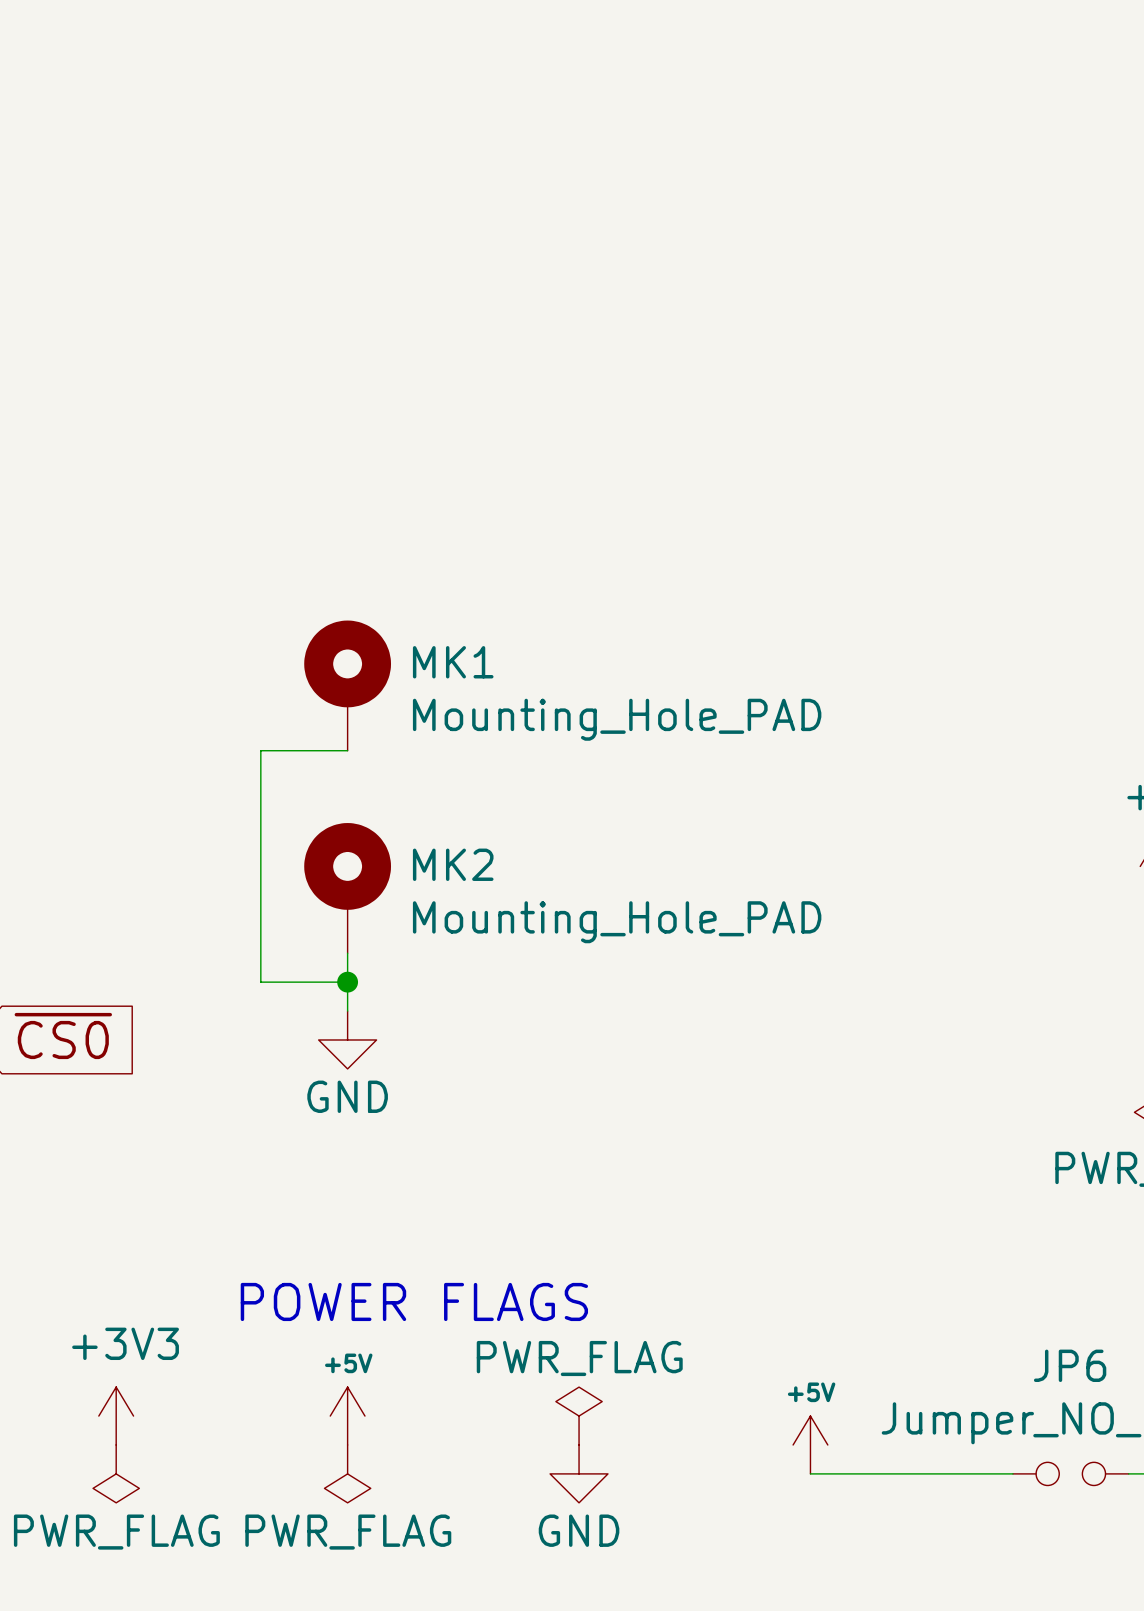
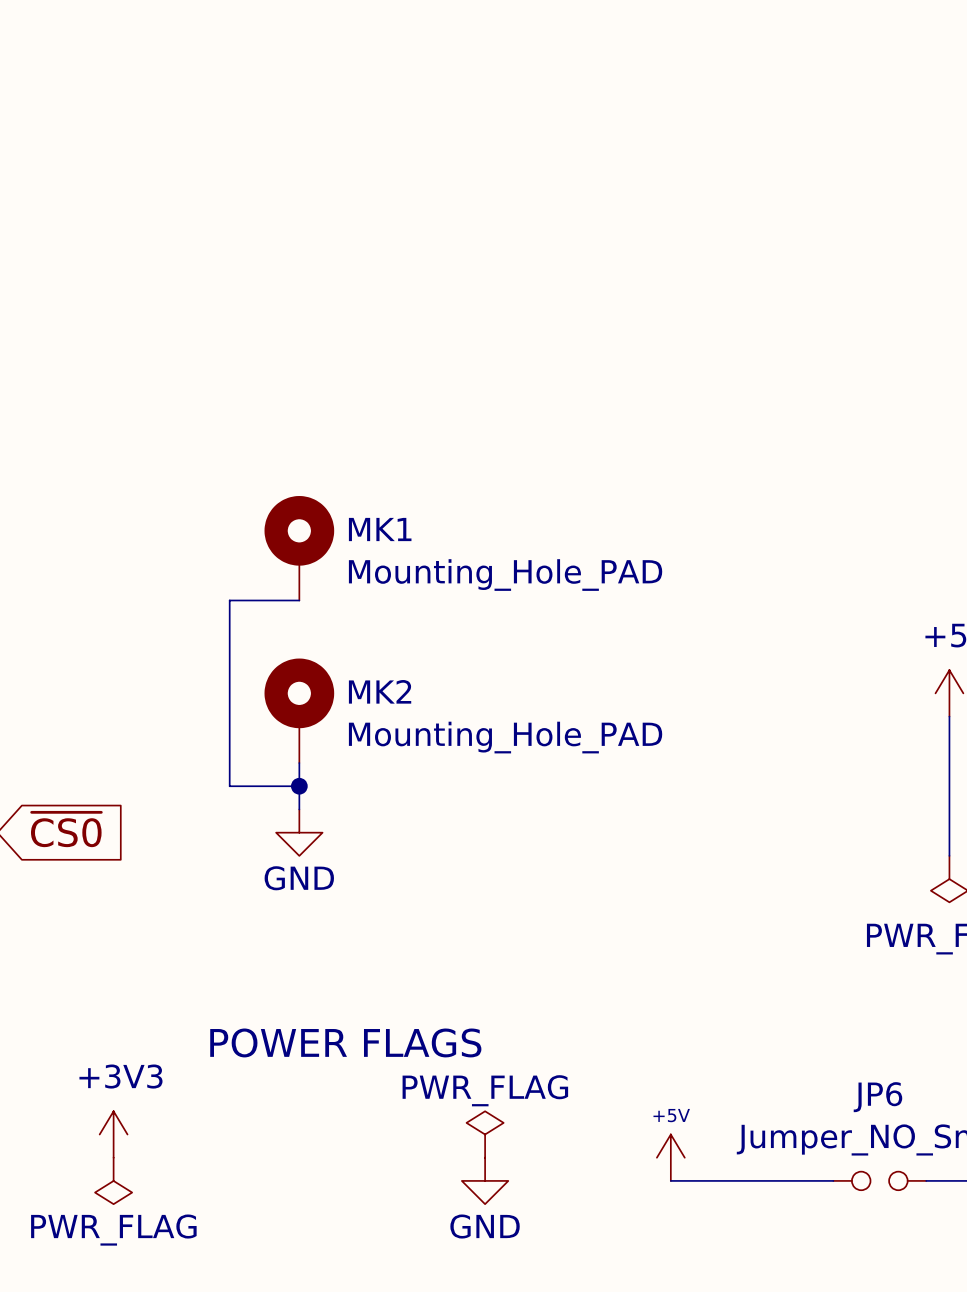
power symbol: +5V (347, 1416) -> none
power symbol: PWR_FLAG (347, 1473) -> none

